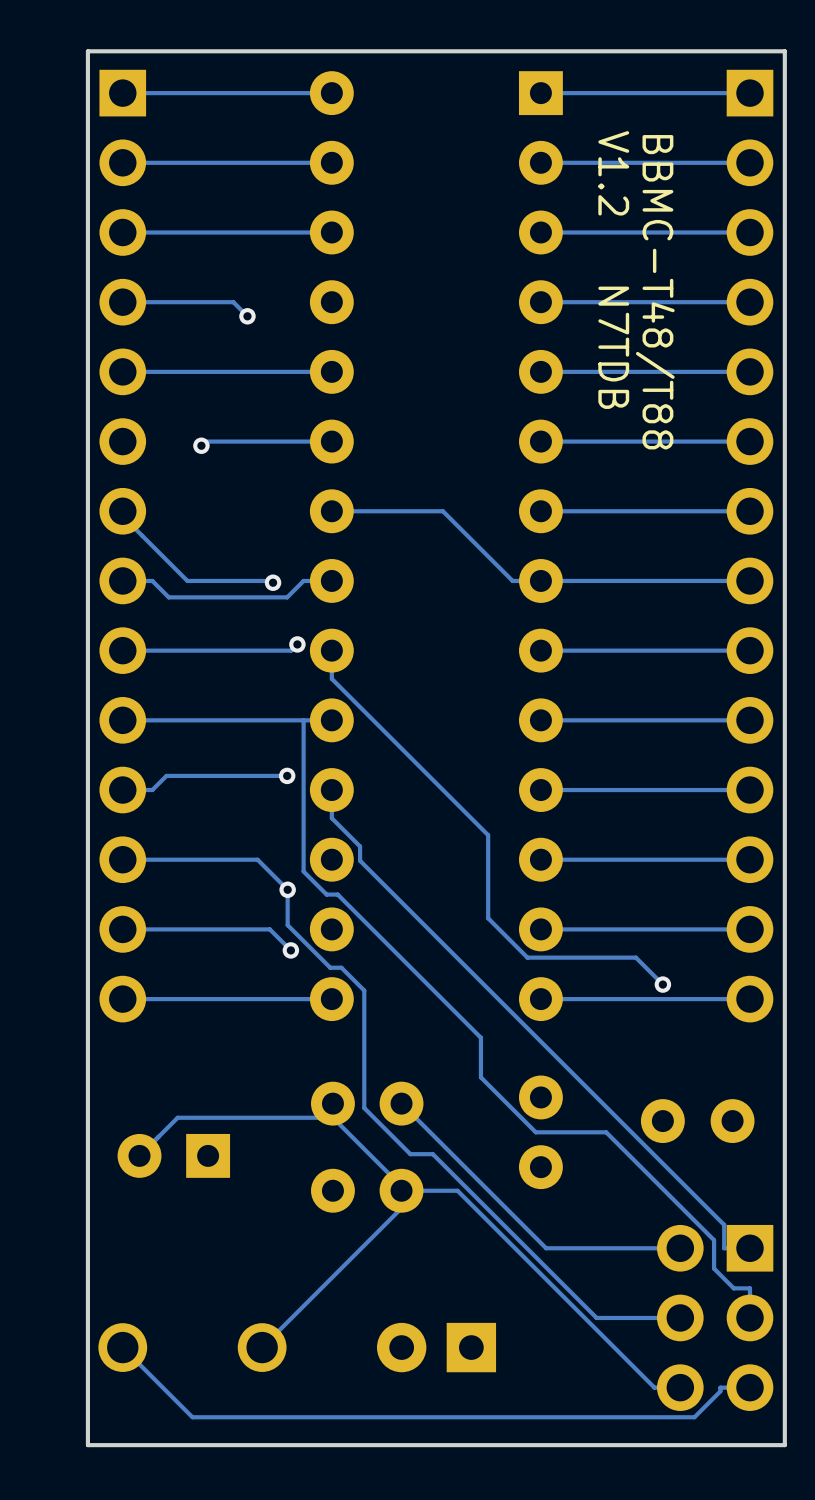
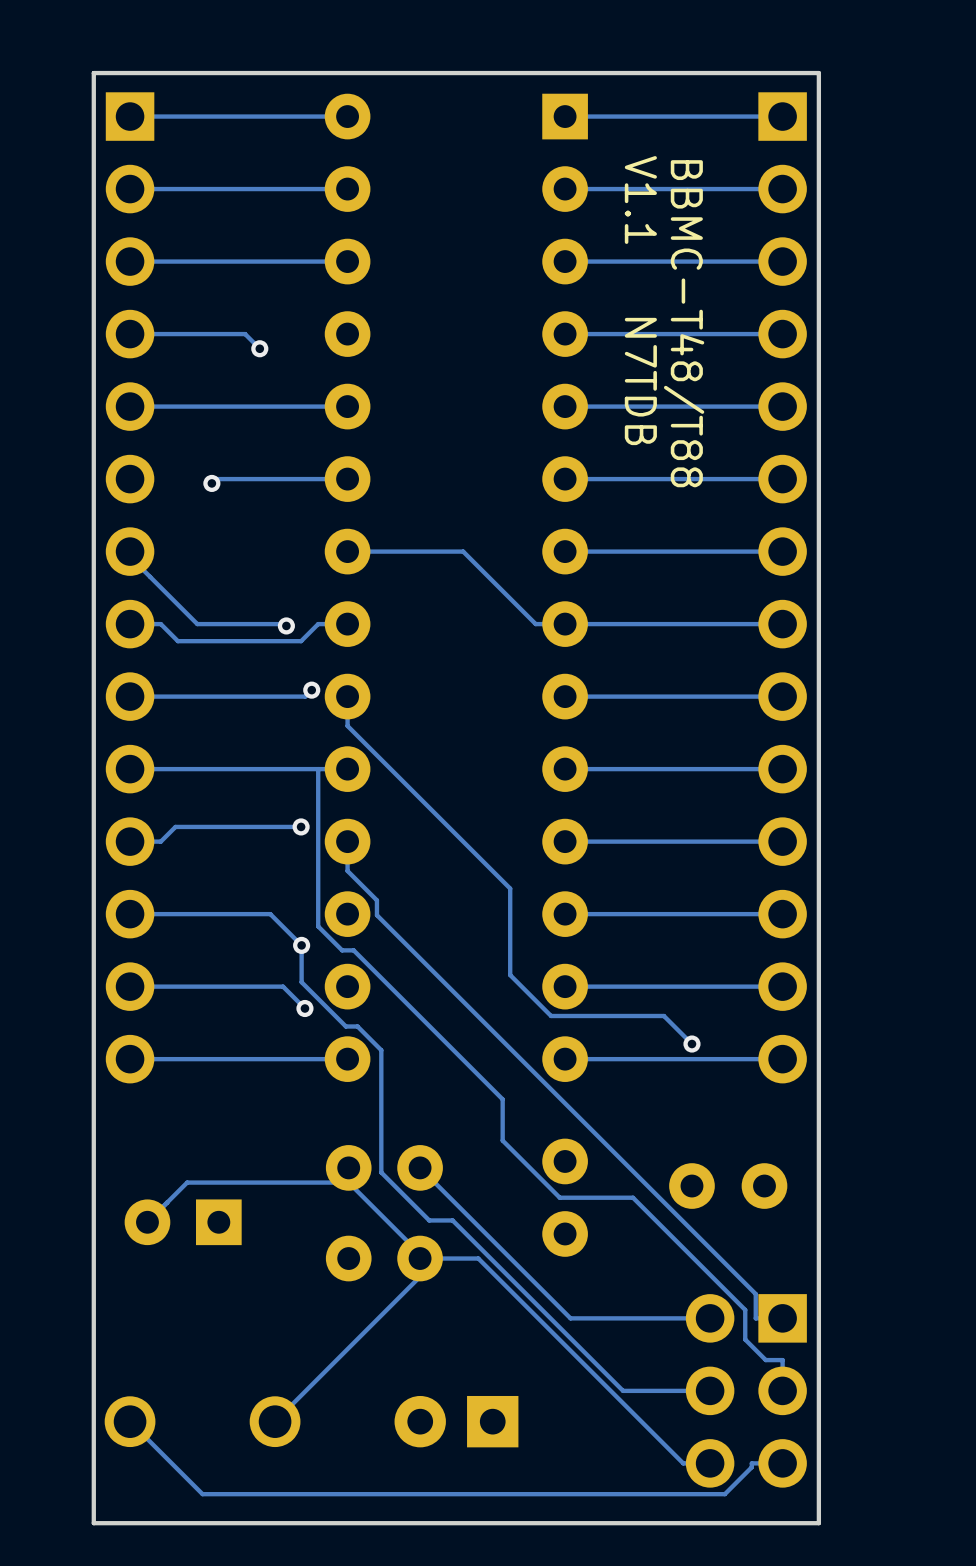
text: V1.2 N7TDB (613, 270) -> V1.1 N7TDB (640, 300)

